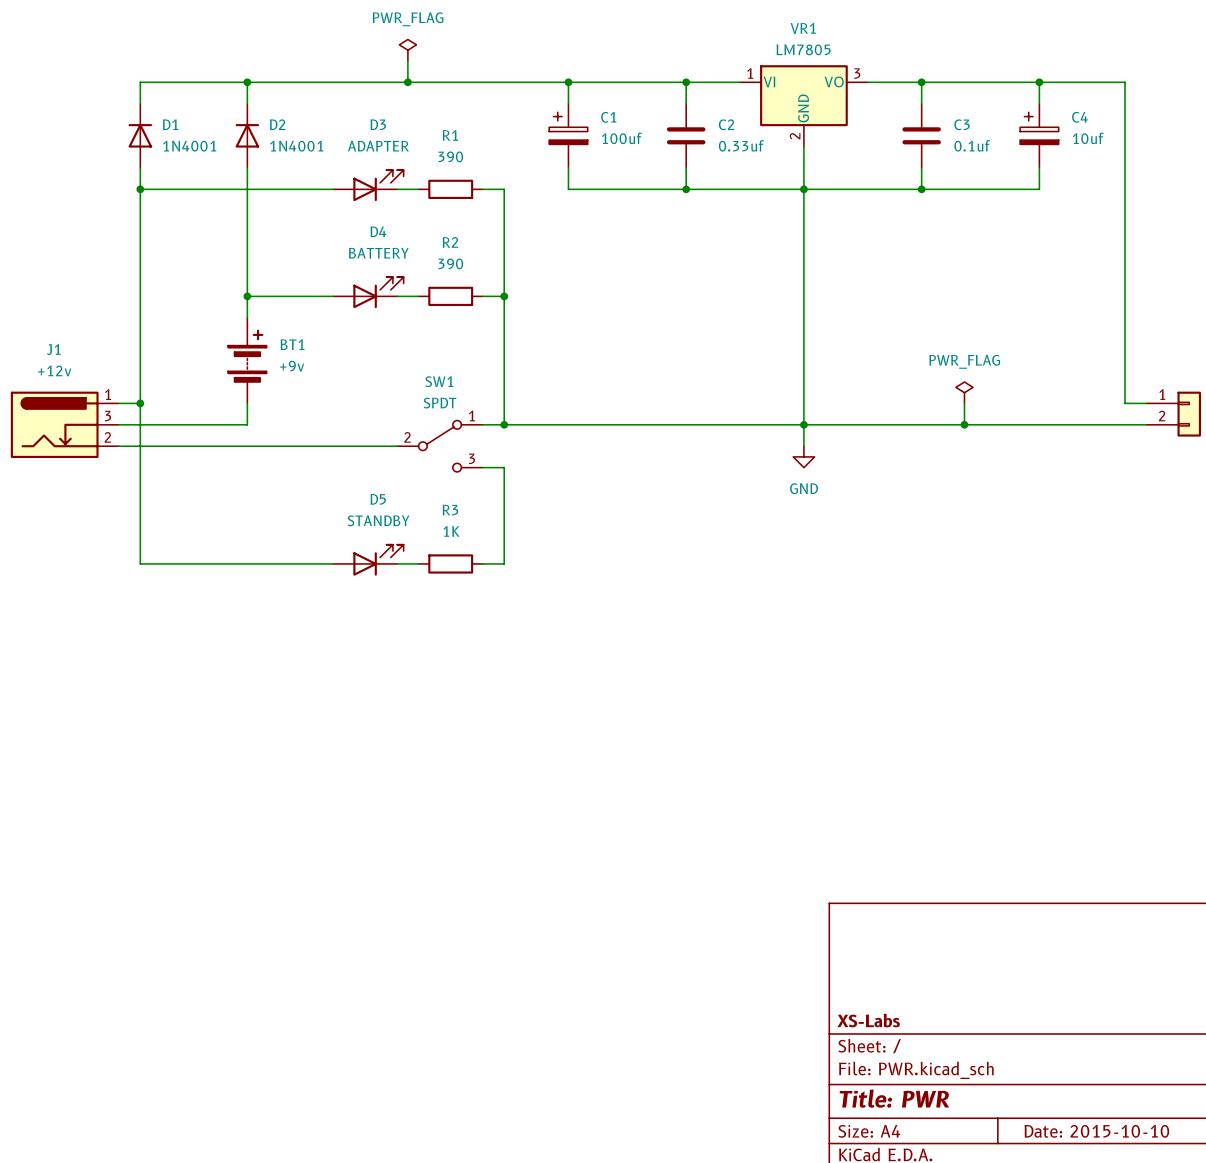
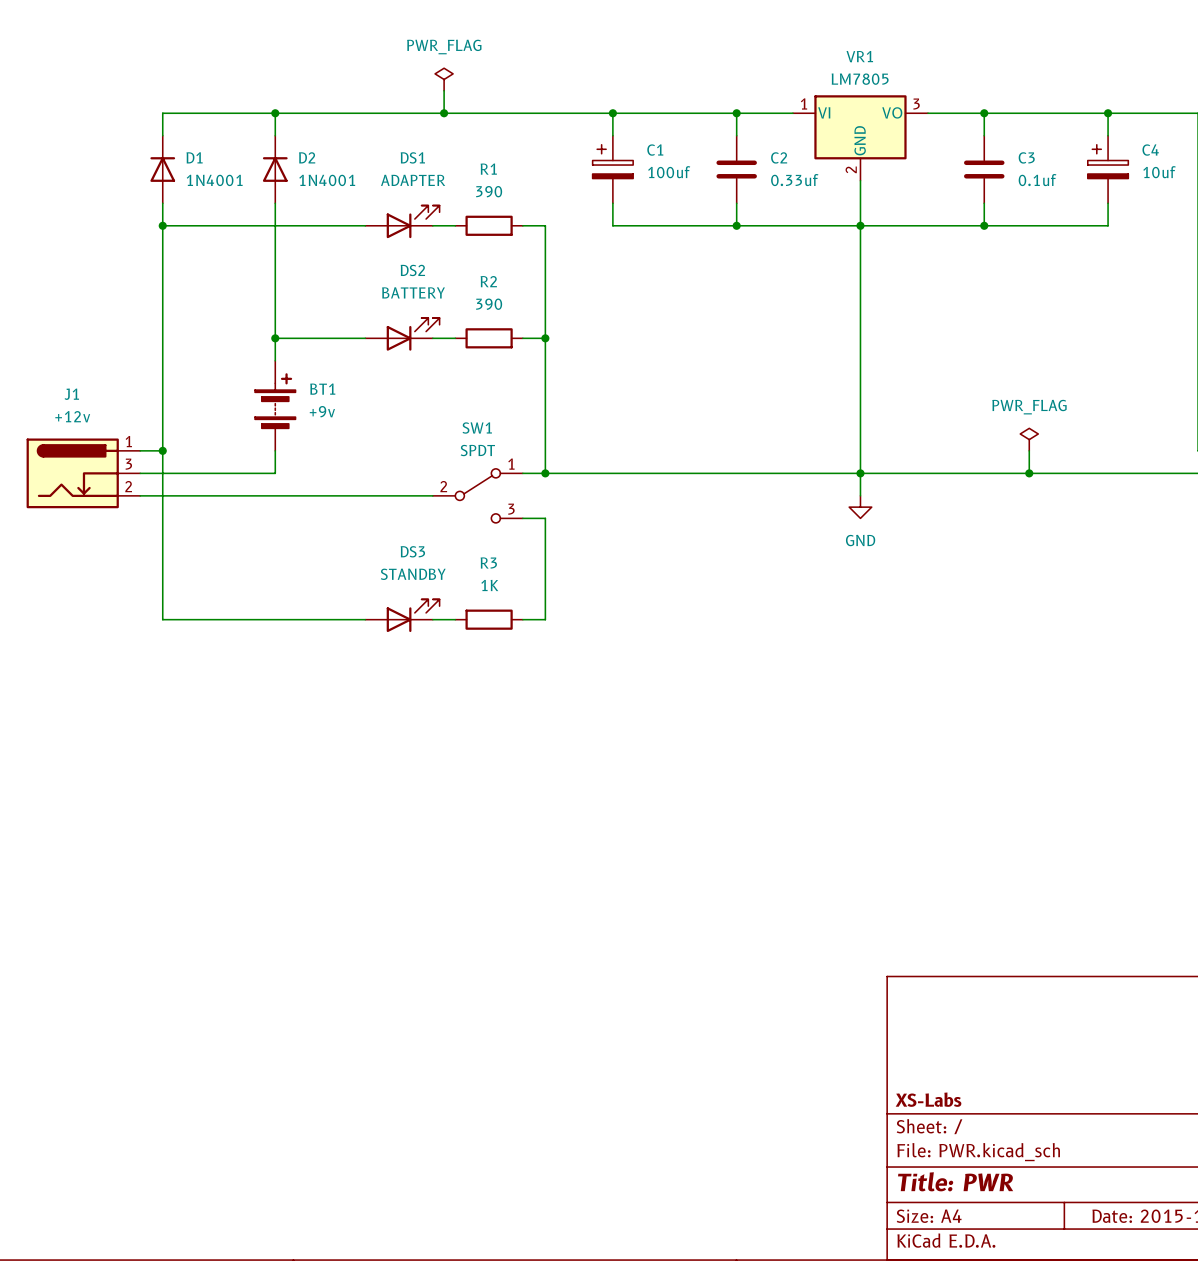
D3 name: D3 (378, 124) -> DS1 (412, 157)
D4 name: D4 (378, 231) -> DS2 (412, 270)
D5 name: D5 (378, 499) -> DS3 (412, 551)

